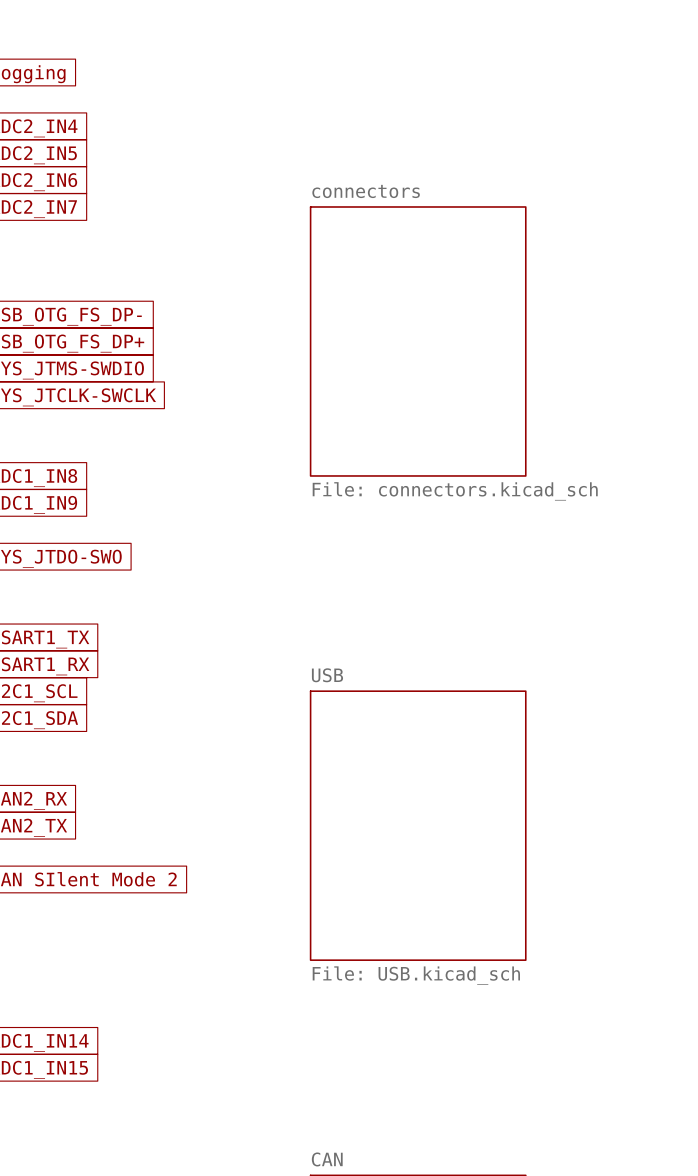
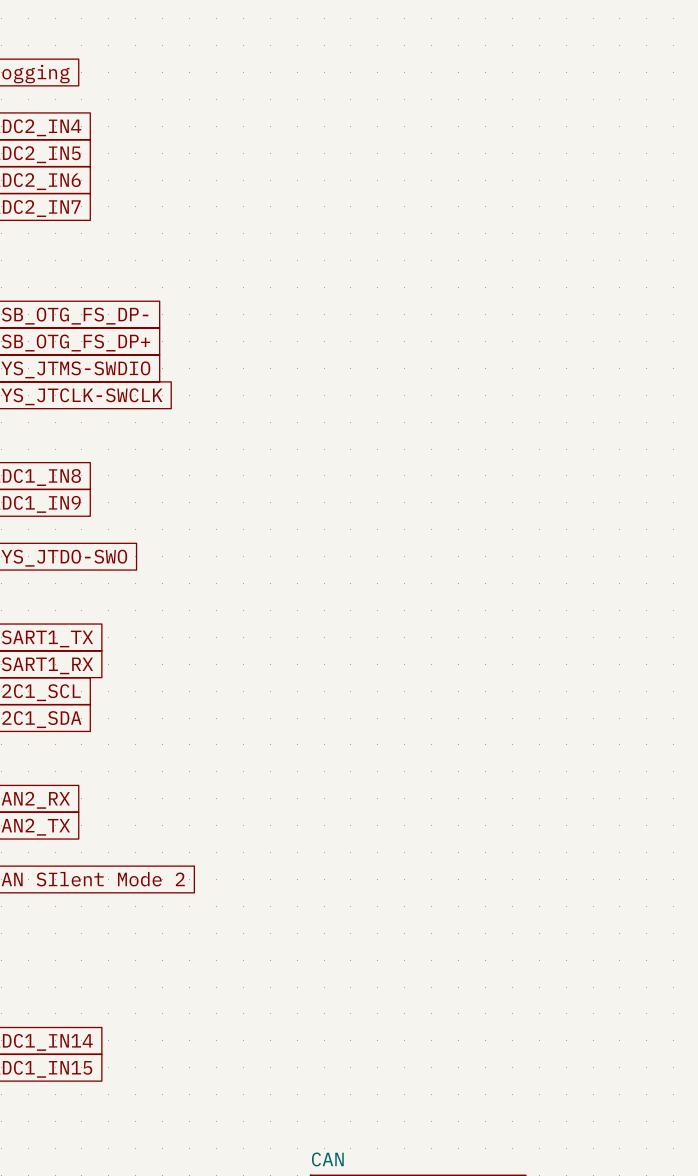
sheet connectors: File: connectors.kicad_sch (418, 341) -> none
sheet USB: File: USB.kicad_sch (418, 825) -> none

